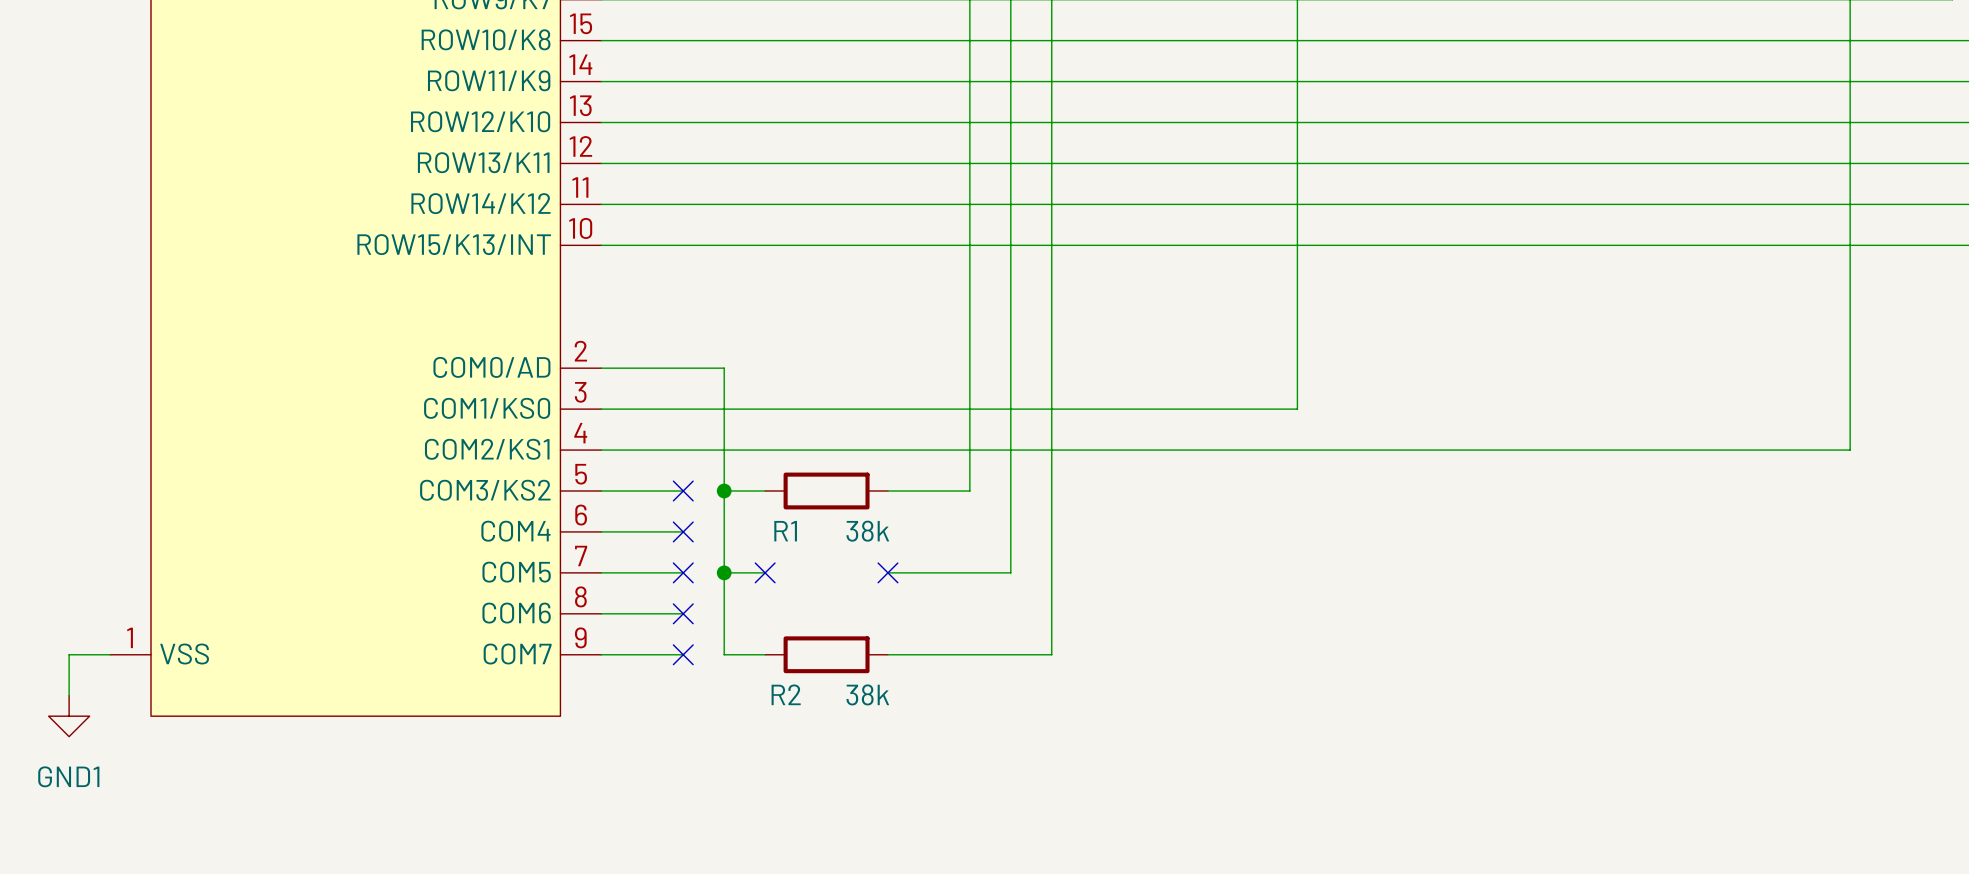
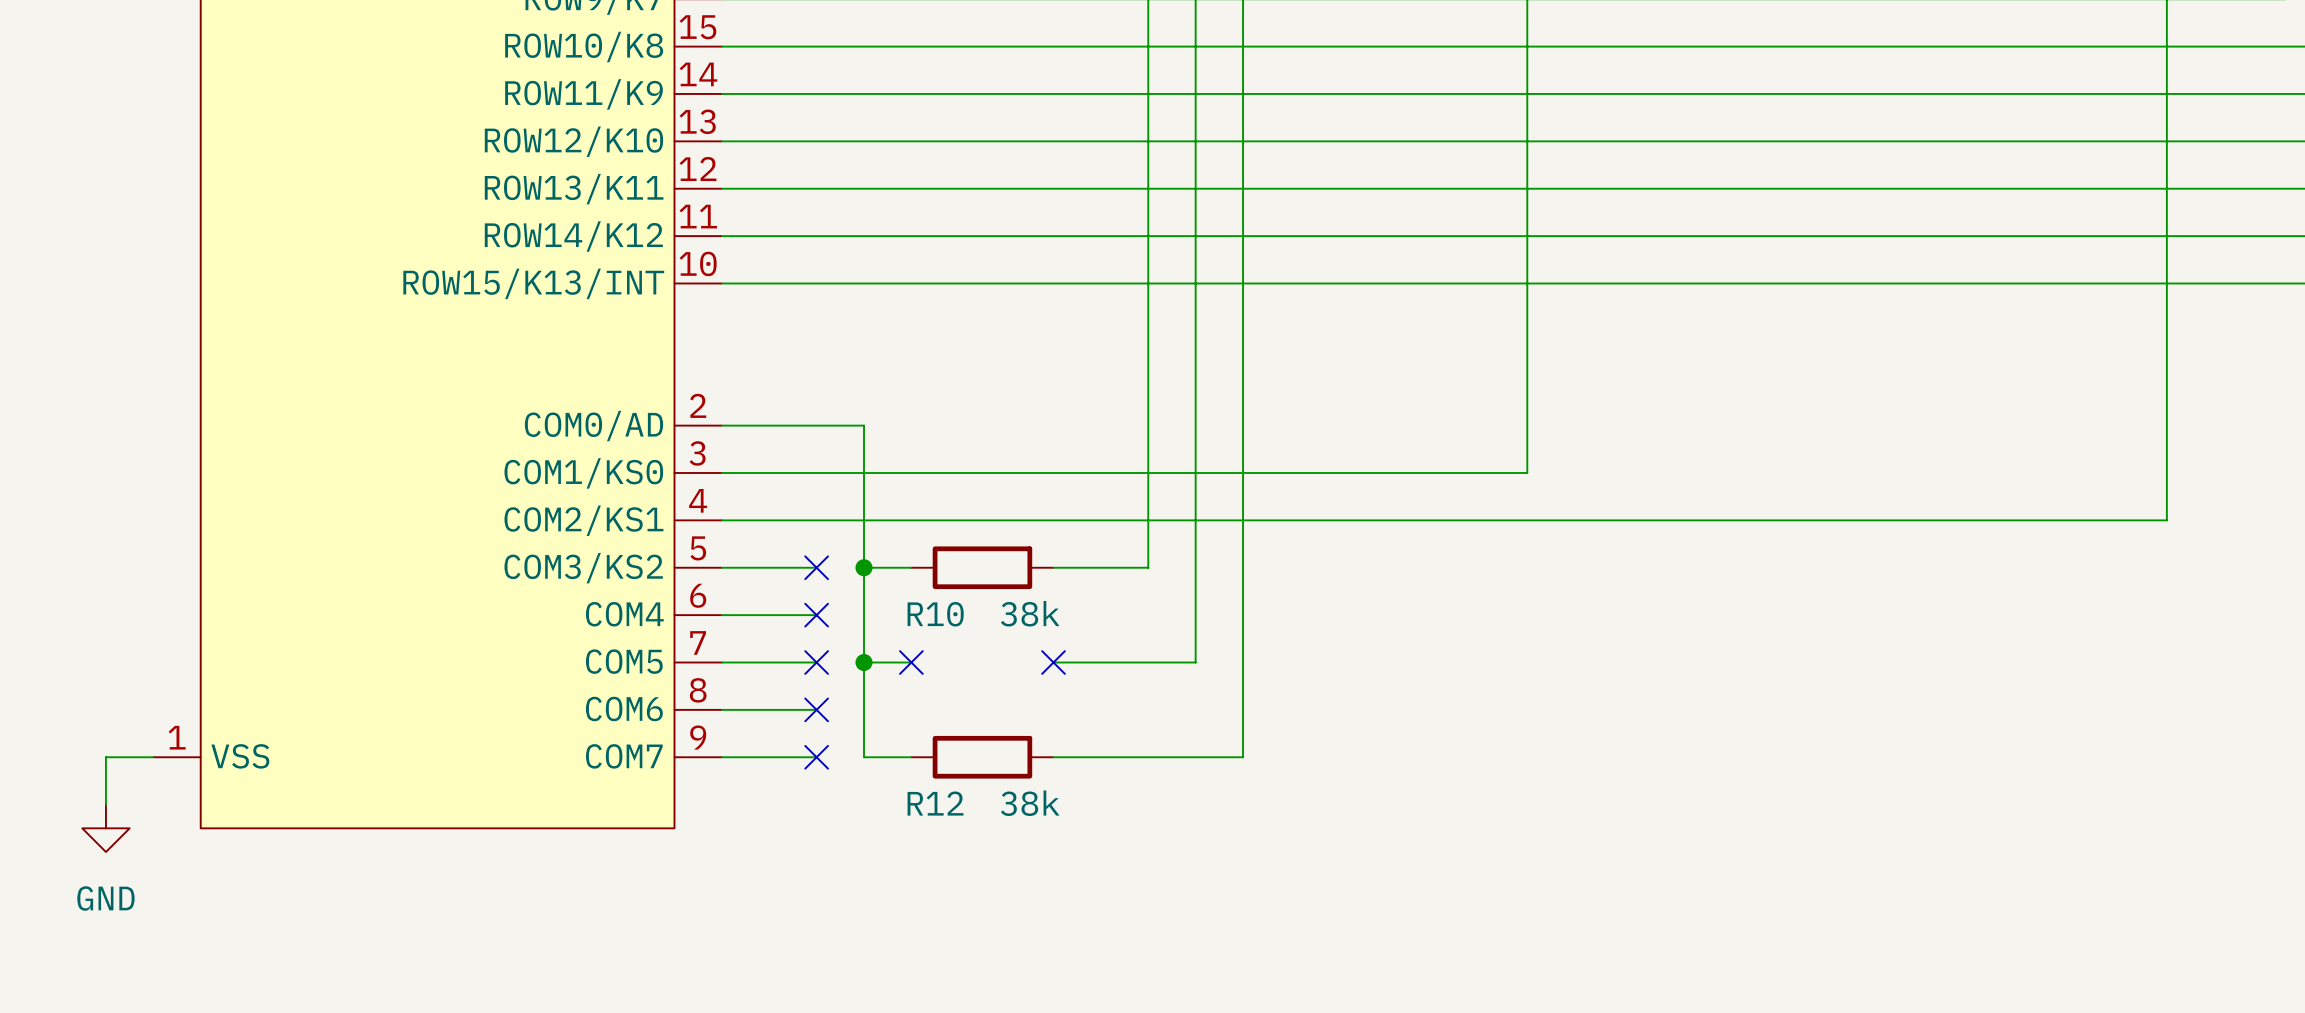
R1 name: R1 (785, 531) -> R10 (935, 614)
R2 name: R2 (786, 694) -> R12 (935, 803)
power symbol: GND1 (69, 716) -> GND (105, 828)

